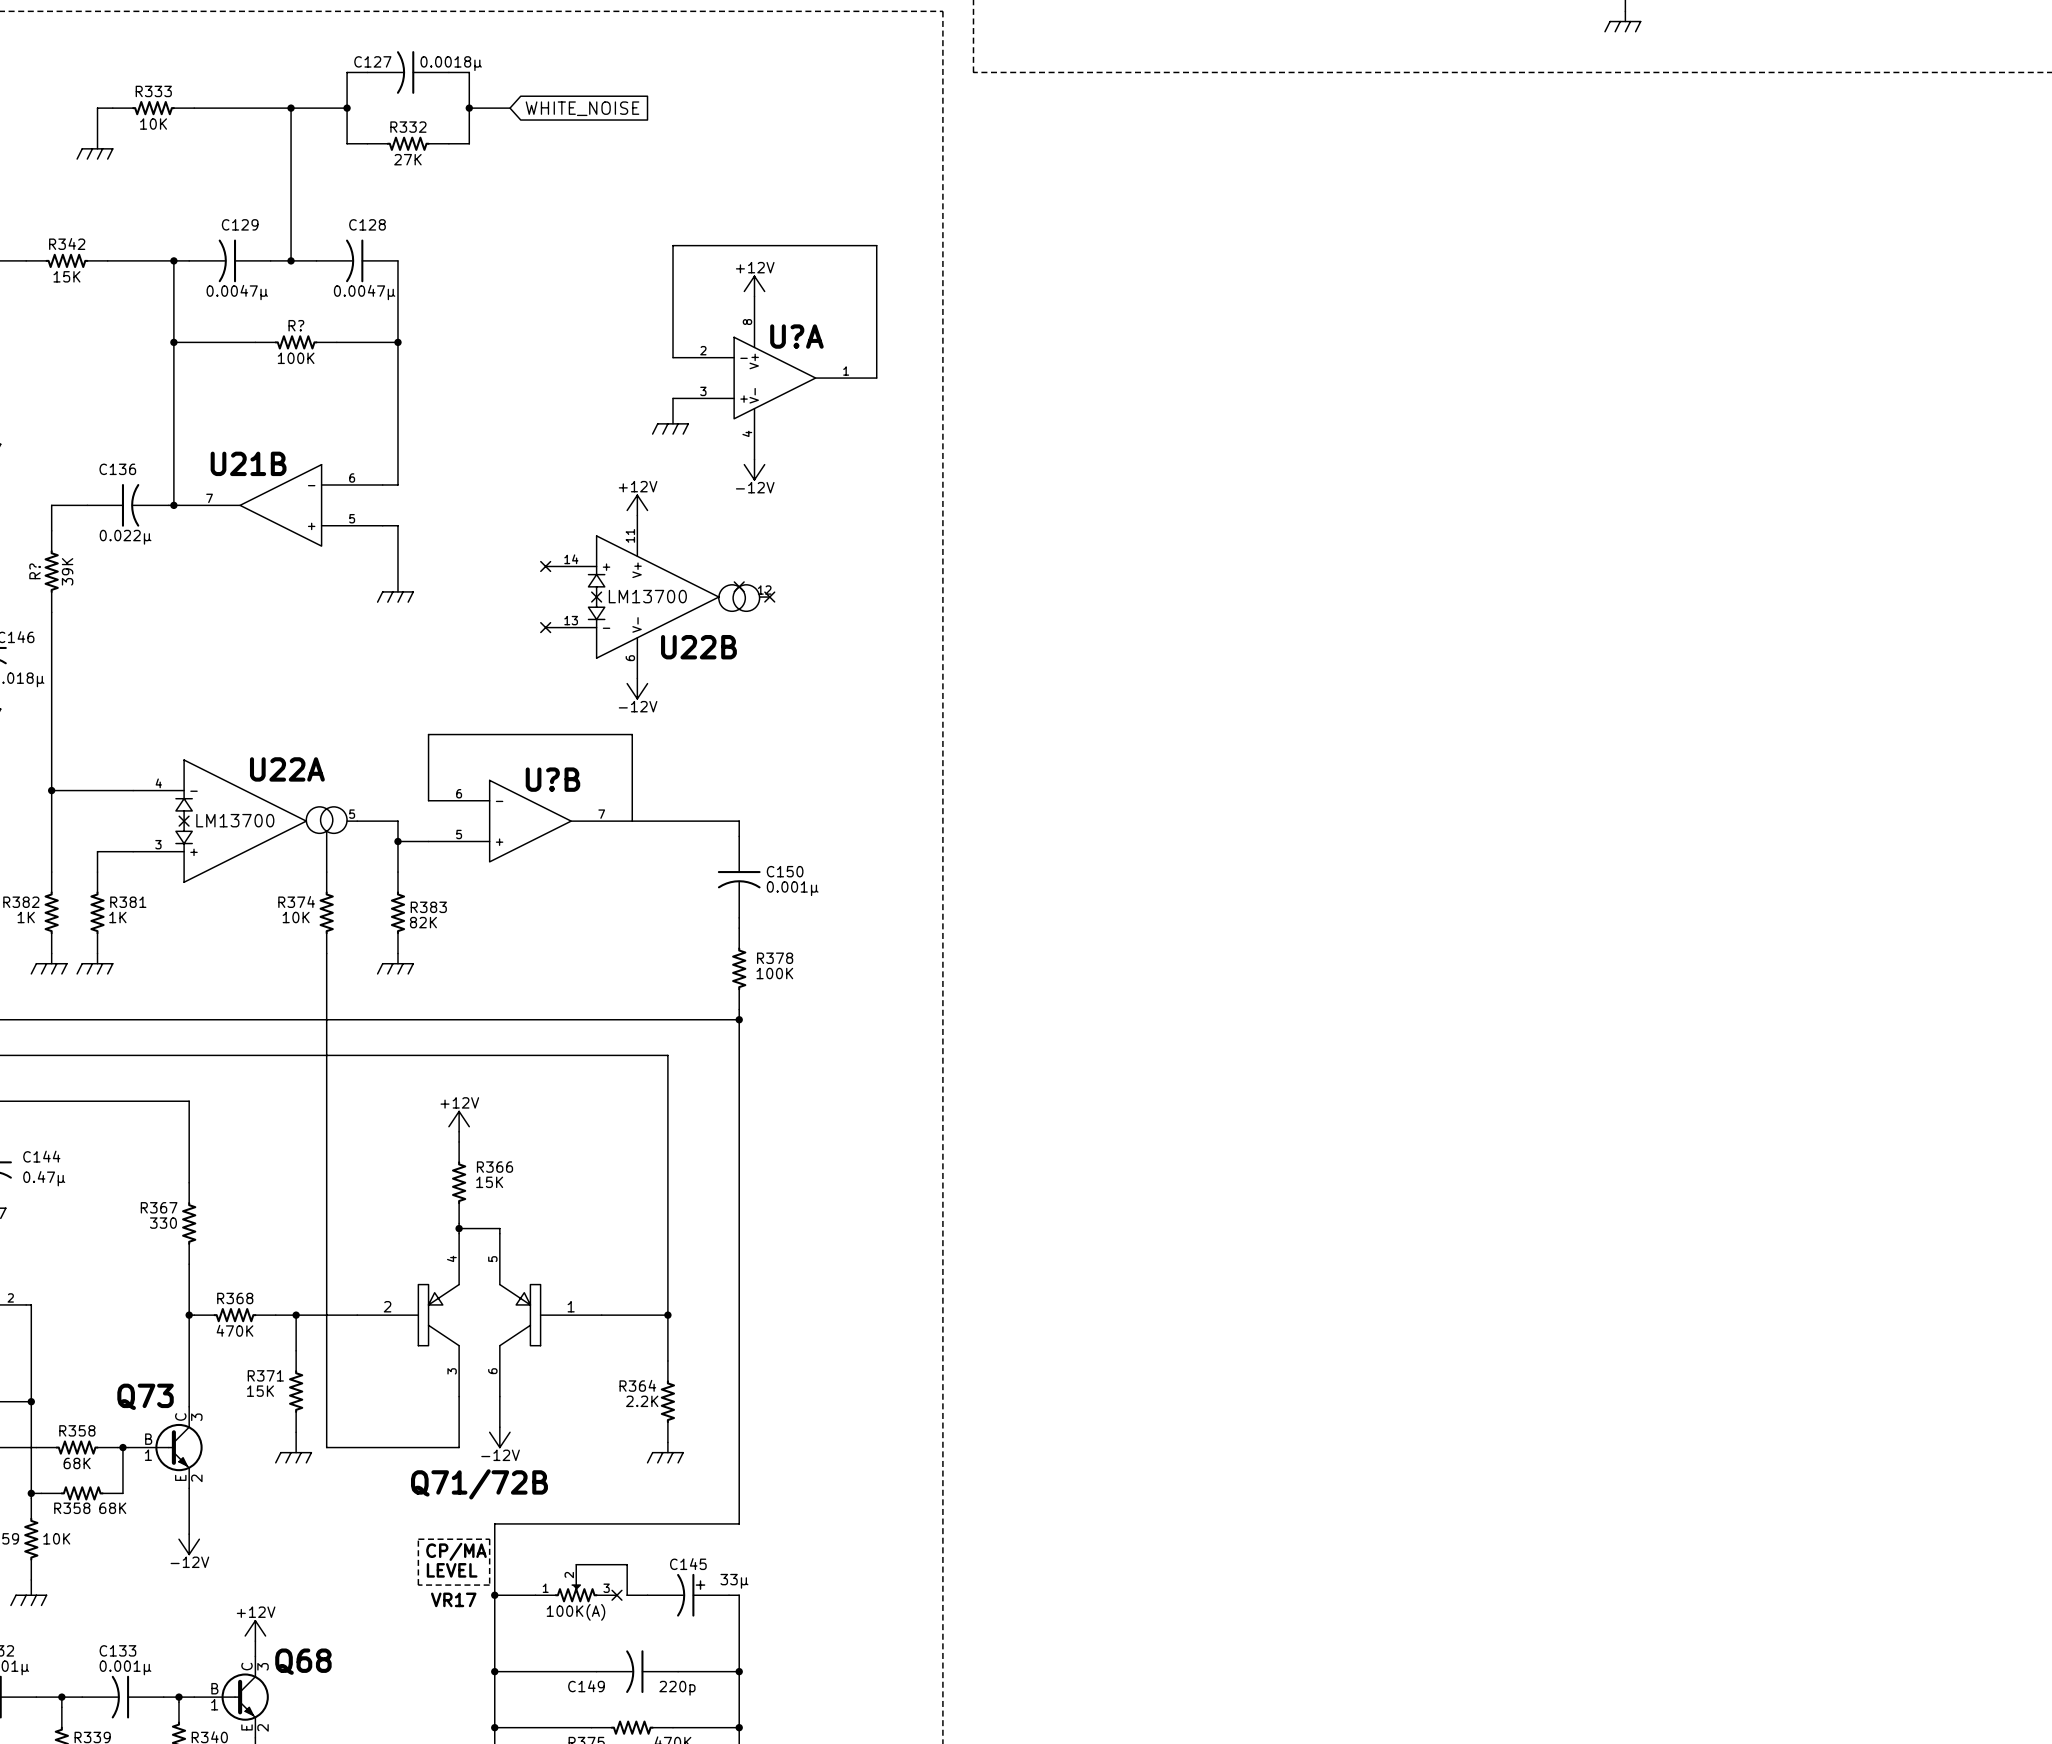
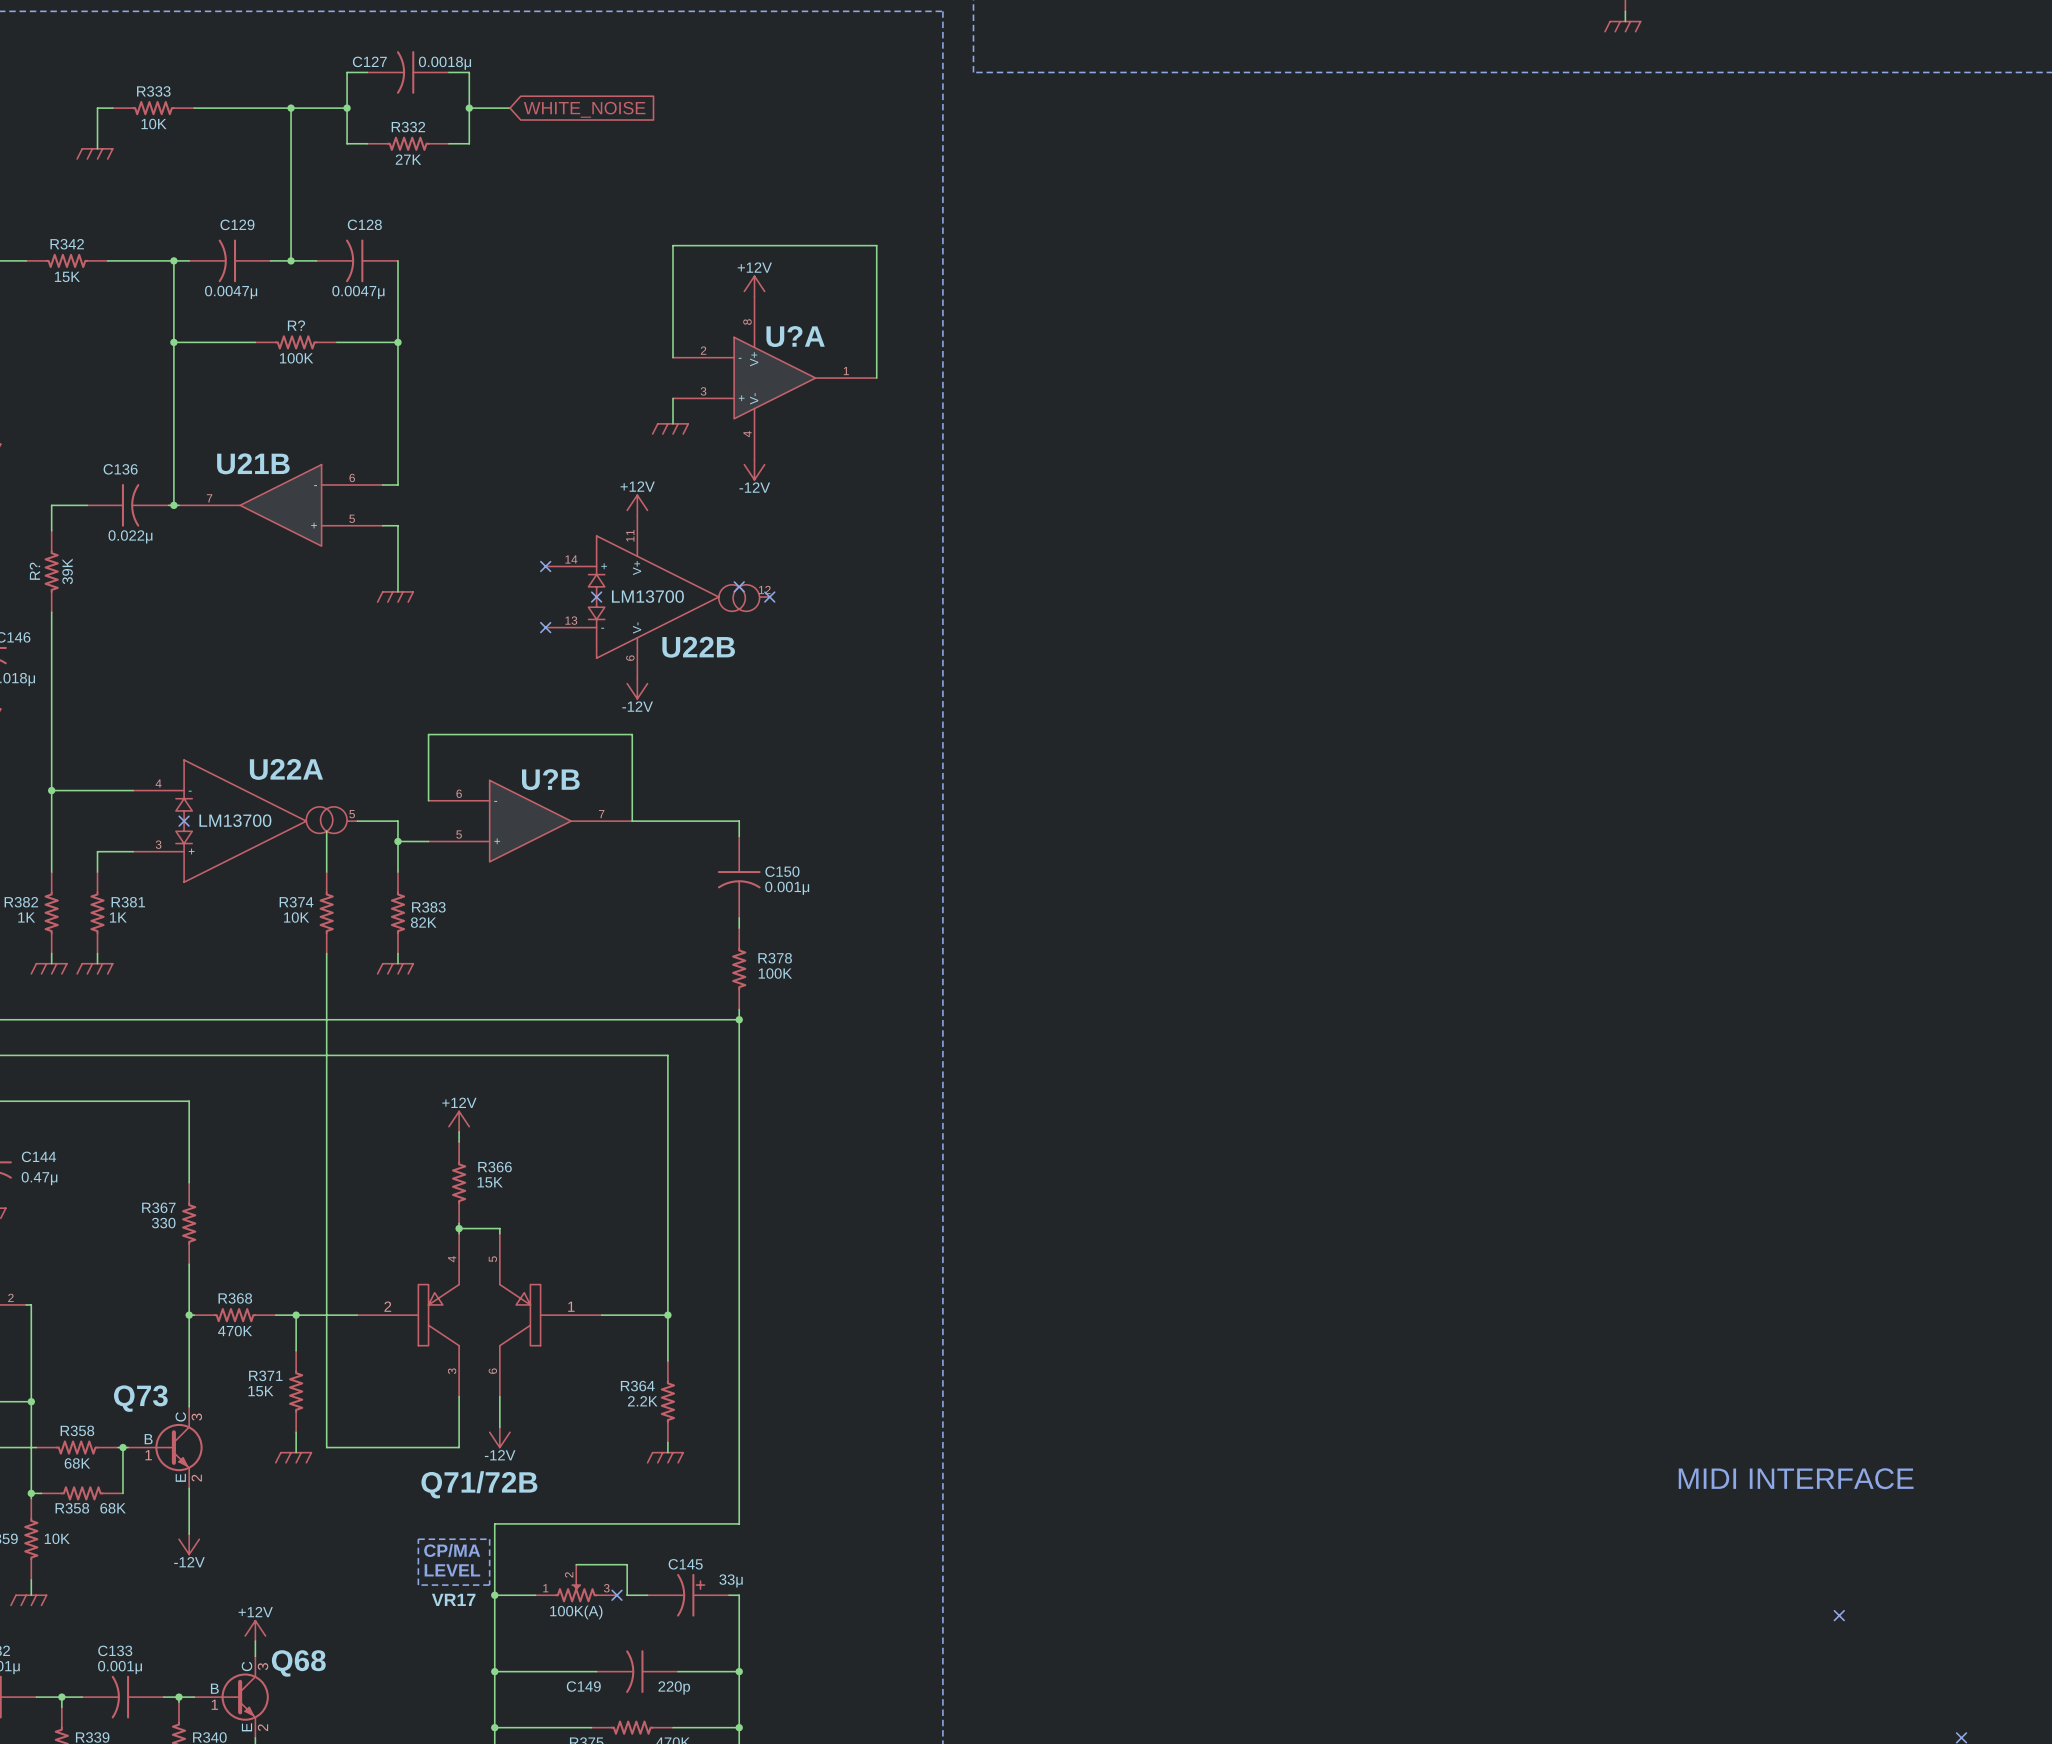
text: none -> MIDI INTERFACE (1796, 1478)
no-connect mark: none -> (1839, 1615)
no-connect mark: none -> (1961, 1737)

